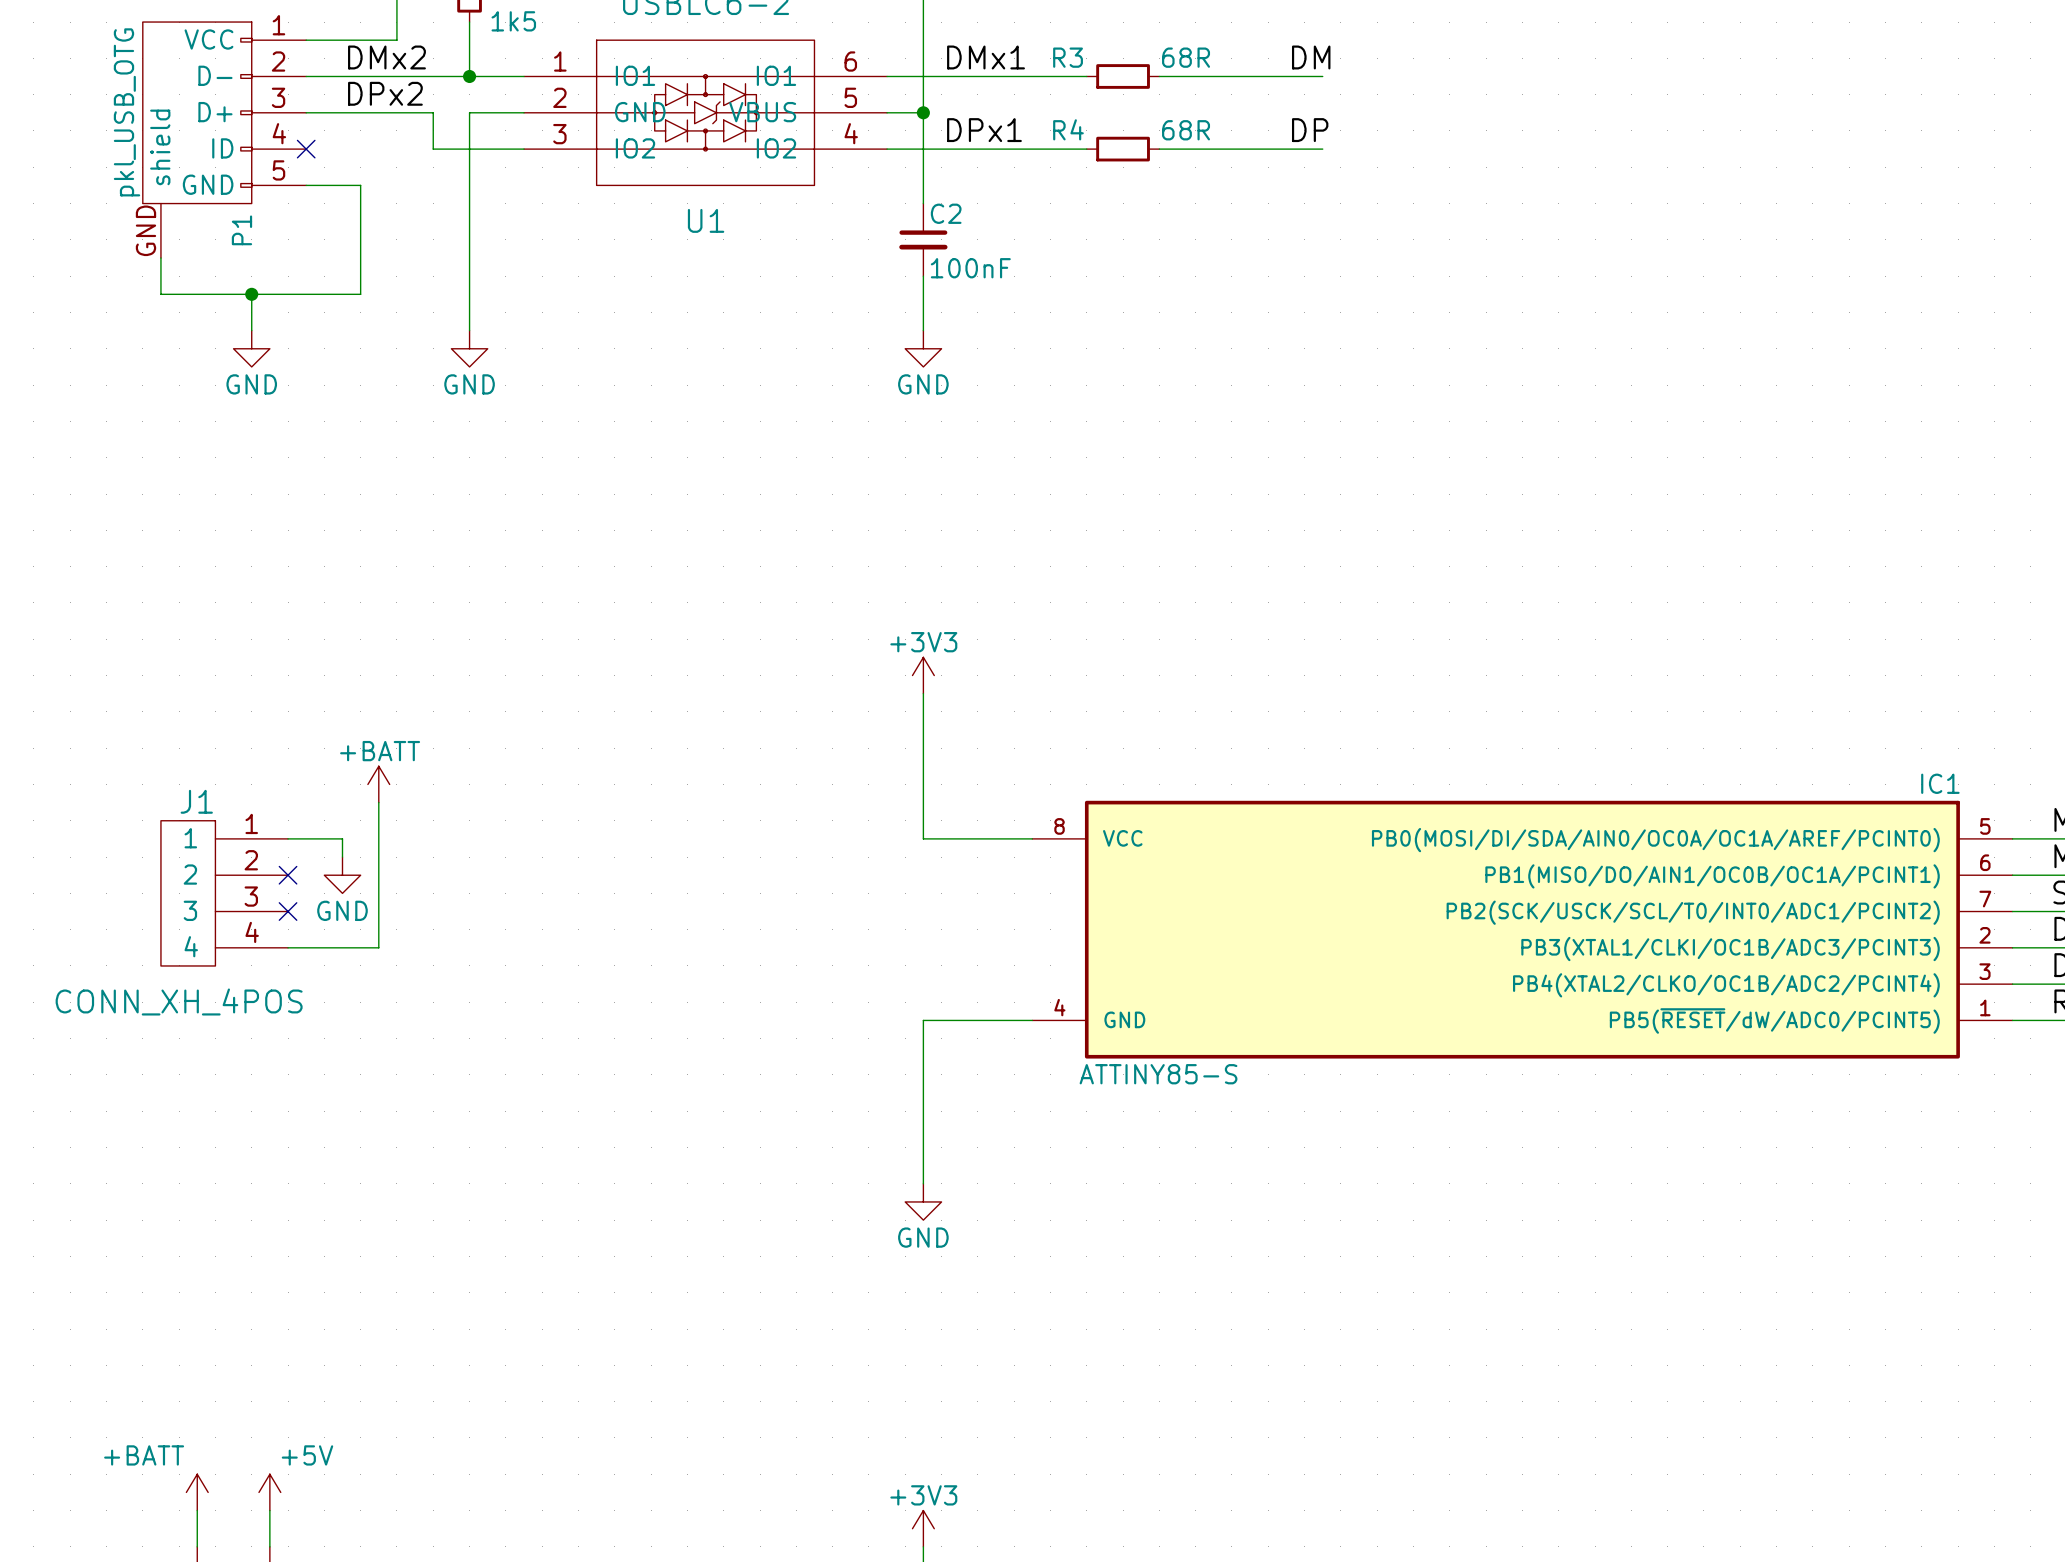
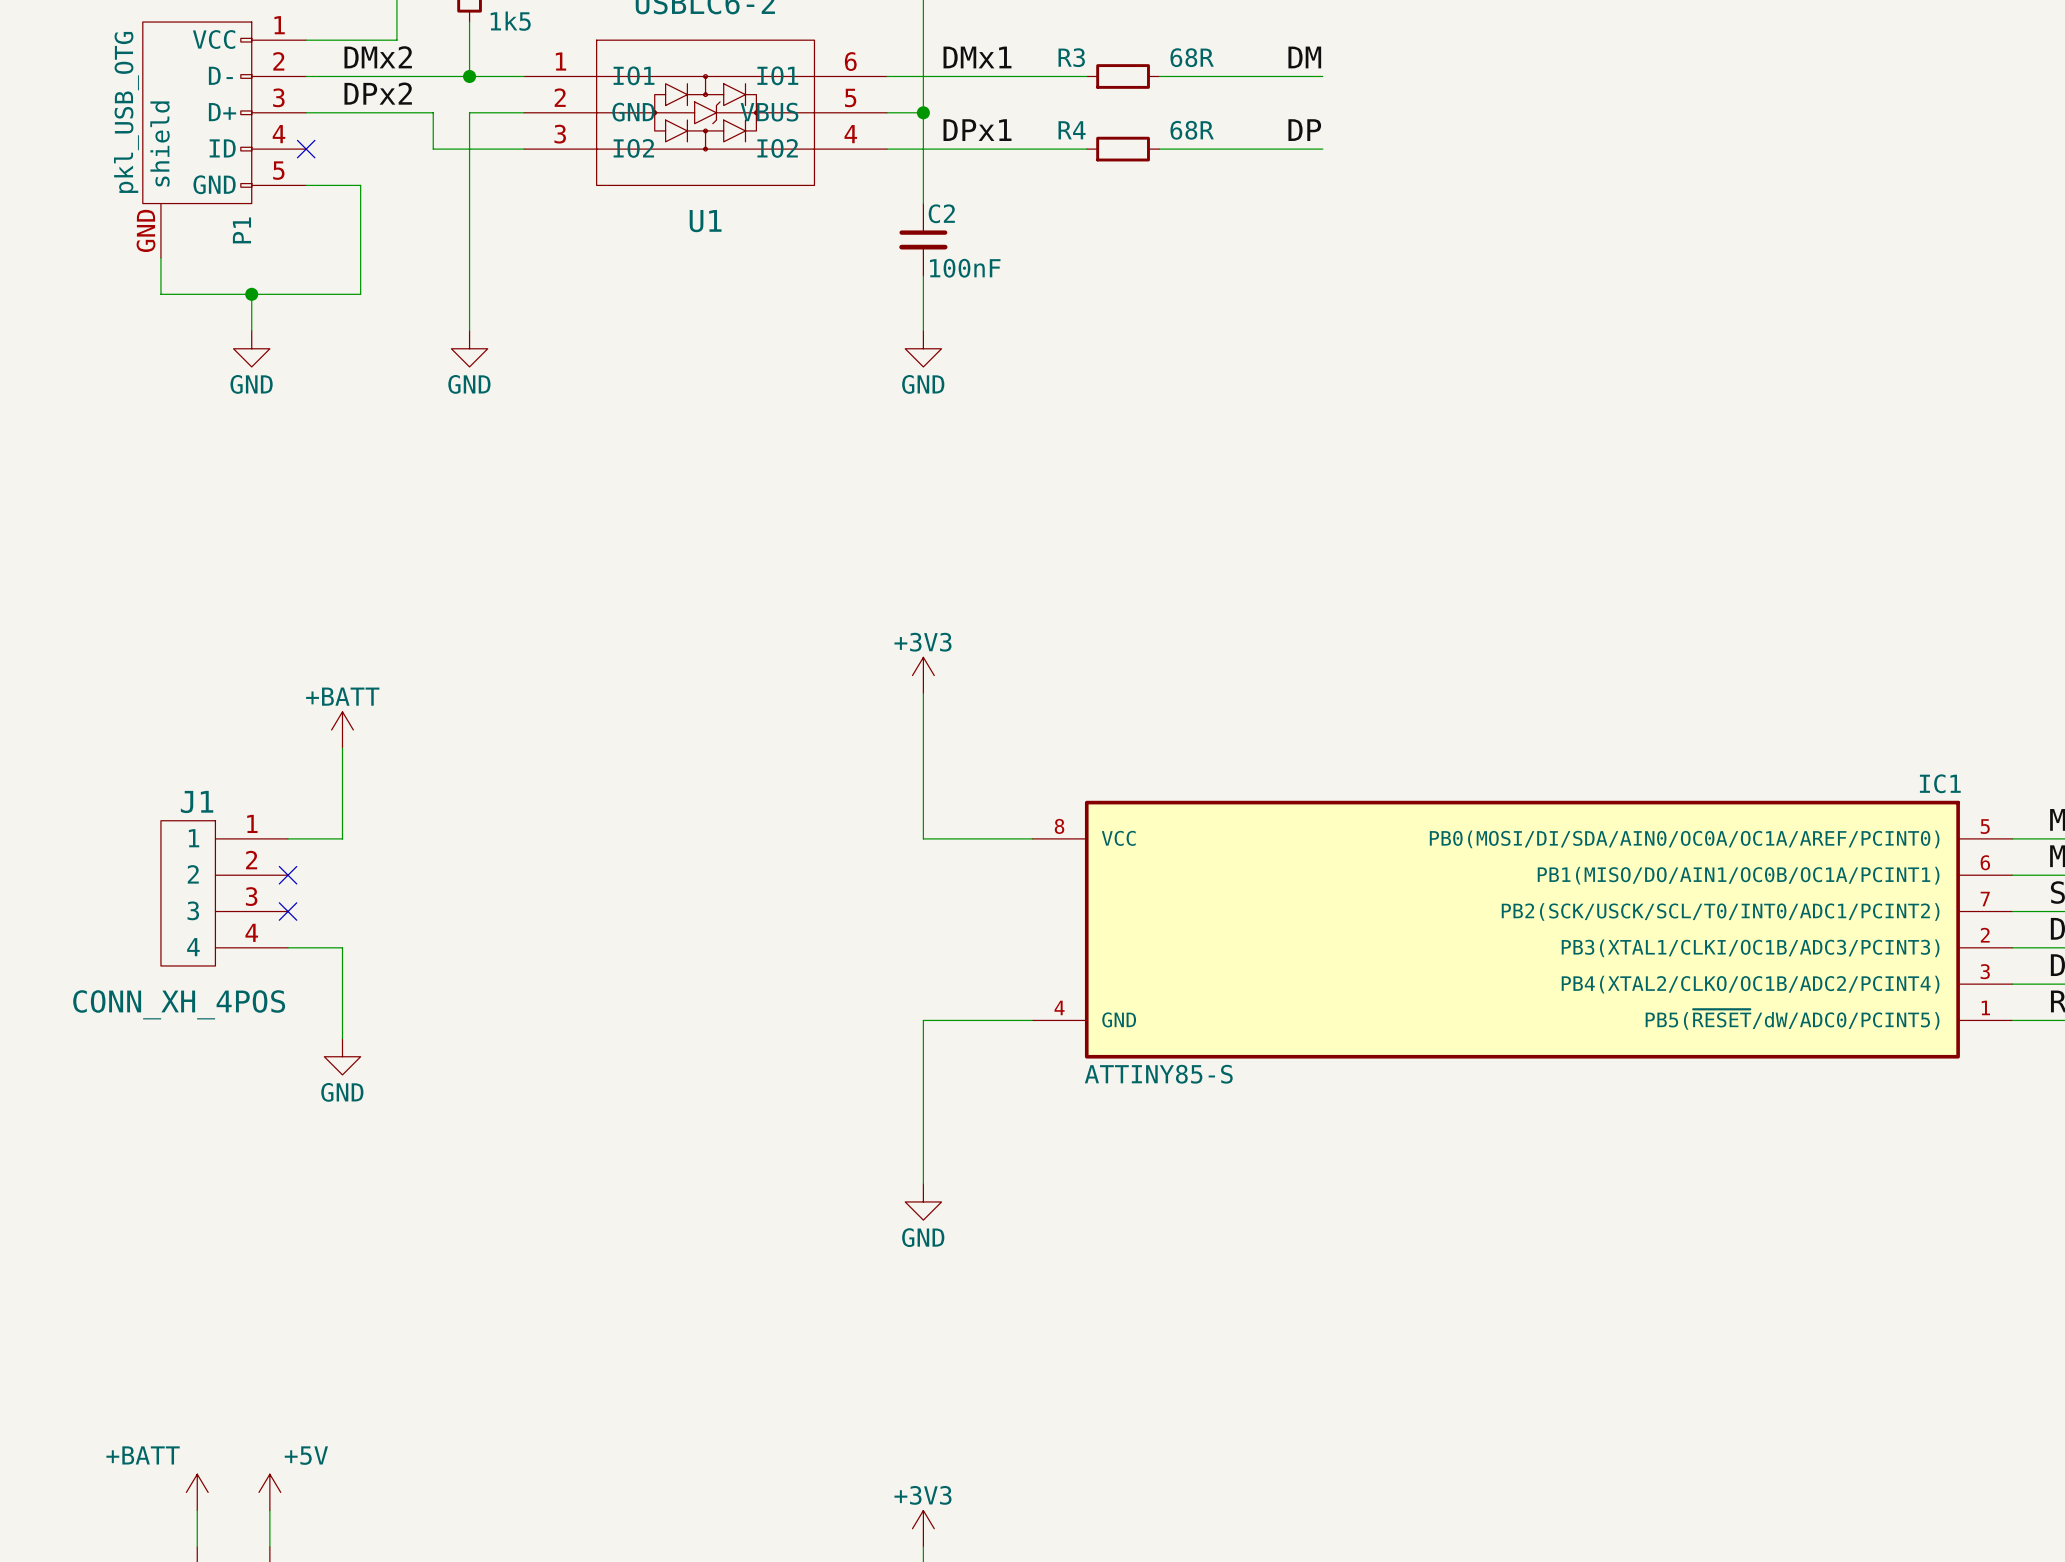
power symbol position: +BATT (378, 784) -> +BATT (342, 729)
wire: (378, 802) (378, 947) (342, 947) -> (342, 1038) (342, 947)
wire: (342, 838) (342, 857) -> (342, 838) (342, 748)
power symbol position: GND (342, 875) -> GND (342, 1056)

